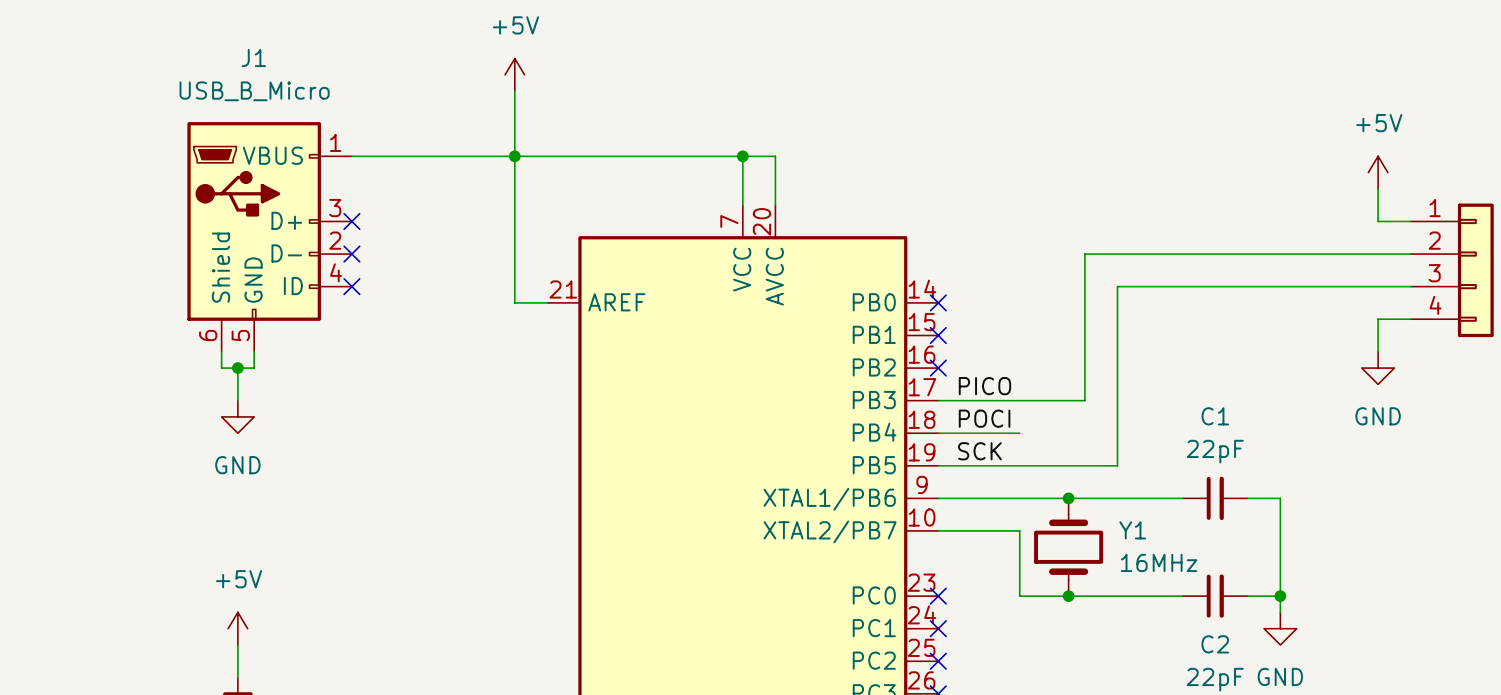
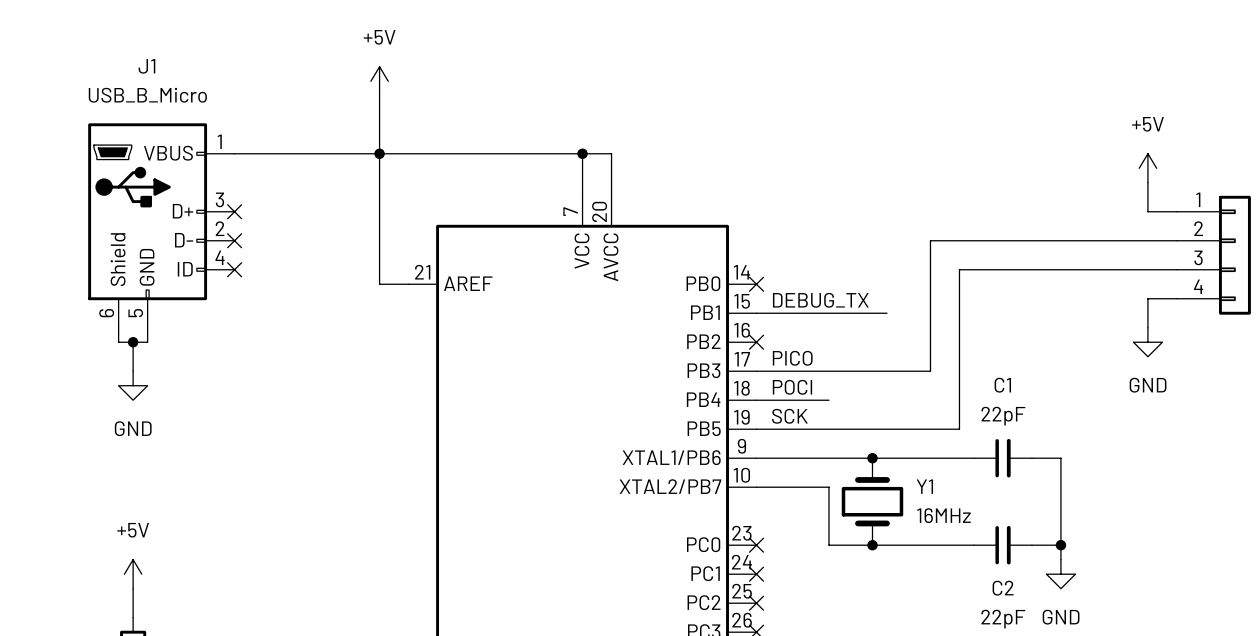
wire: (1133, 254) (1084, 254) (1084, 400) -> (930, 240) (930, 371) (886, 371)
wire: (1166, 286) (1117, 286) (1117, 465) -> (959, 269) (959, 429) (915, 429)
label: none -> DEBUG_TX (820, 300)
wire: none -> (756, 313) (886, 313)
no-connect mark: (938, 335) -> none

